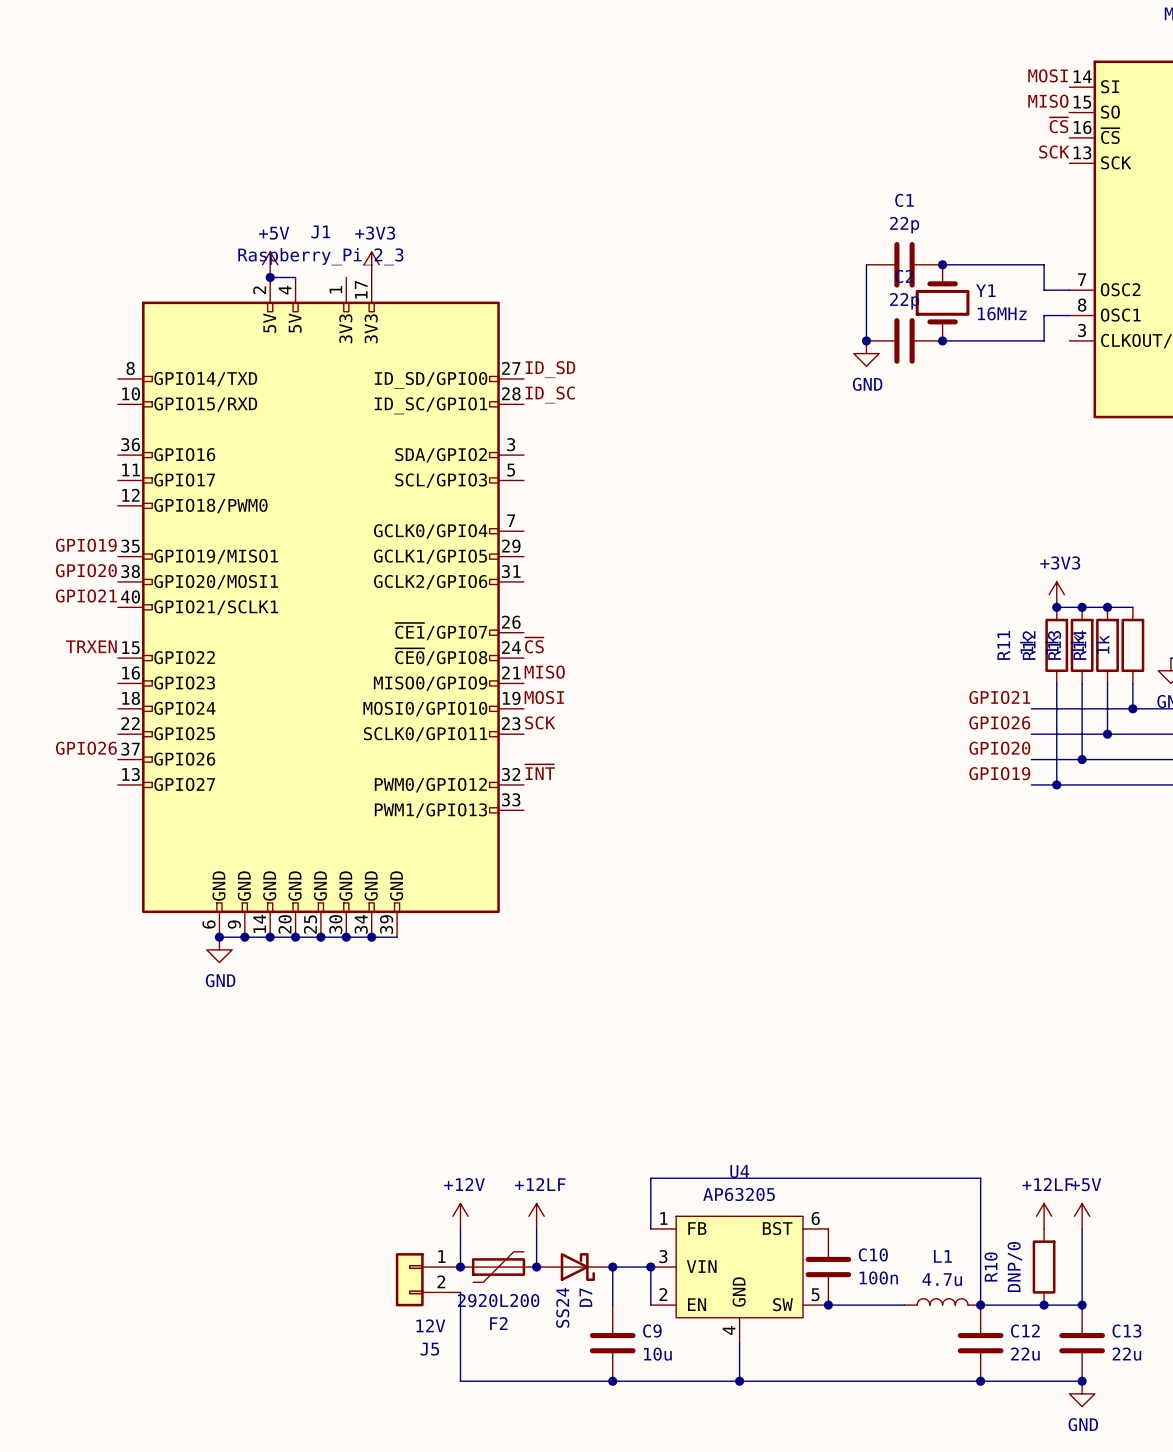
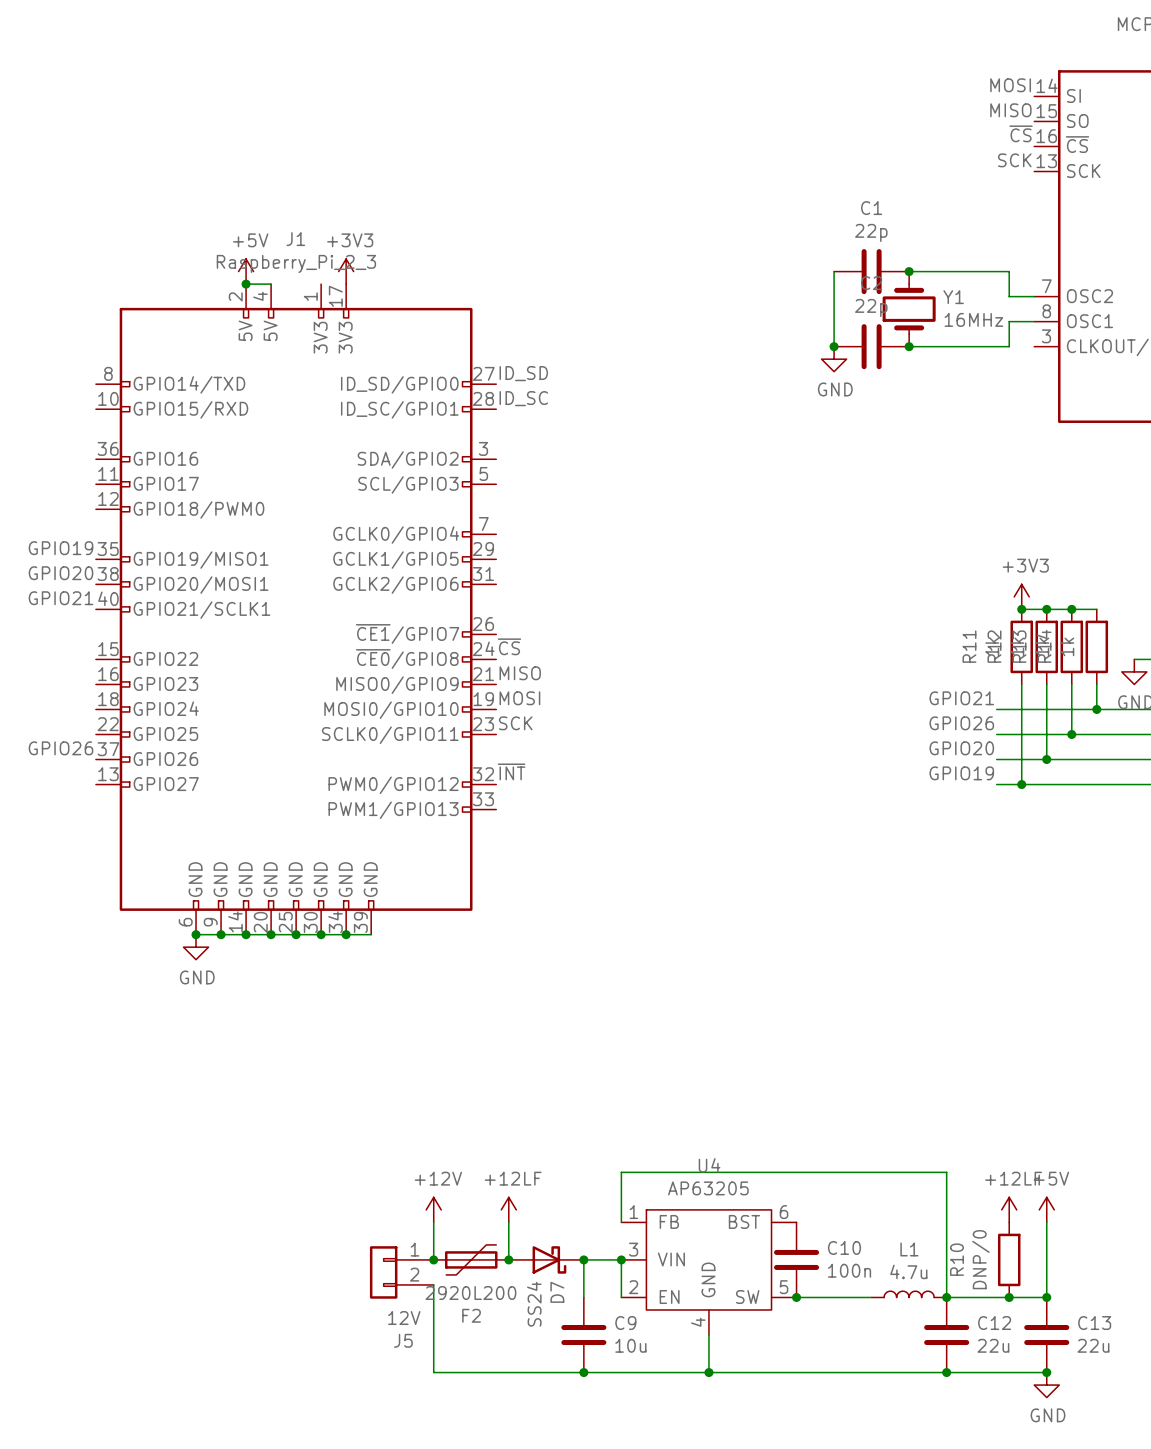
label: TRXEN (91, 646) -> none

